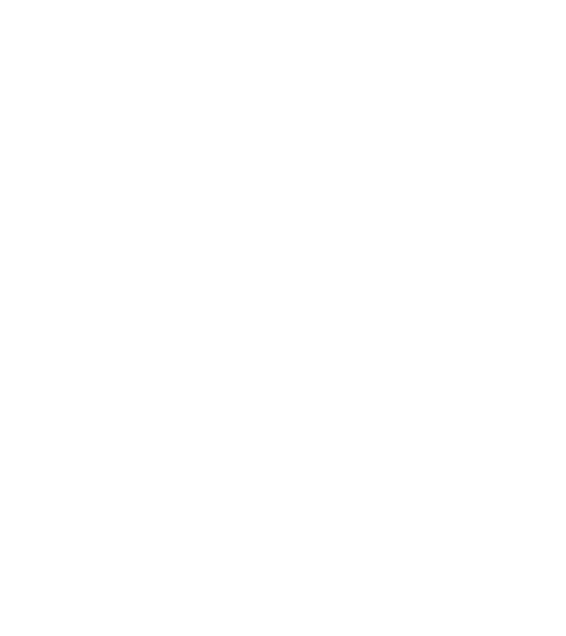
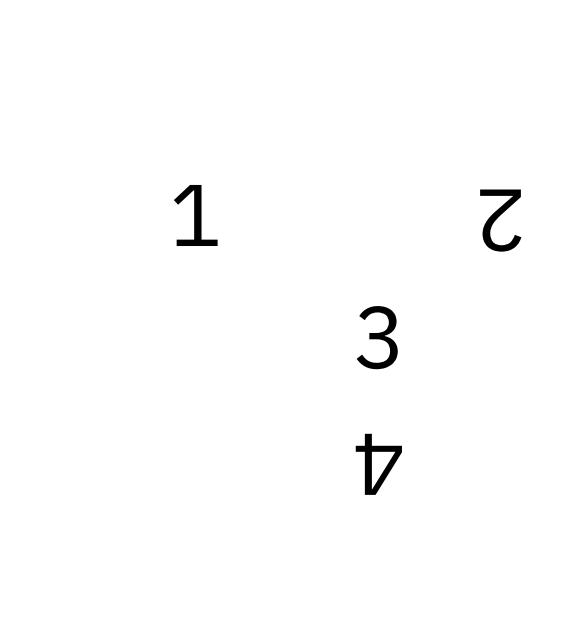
text: none -> 1 (195, 215)
text: none -> 2 (500, 220)
text: none -> 3 (377, 337)
text: none -> 4 (378, 464)

